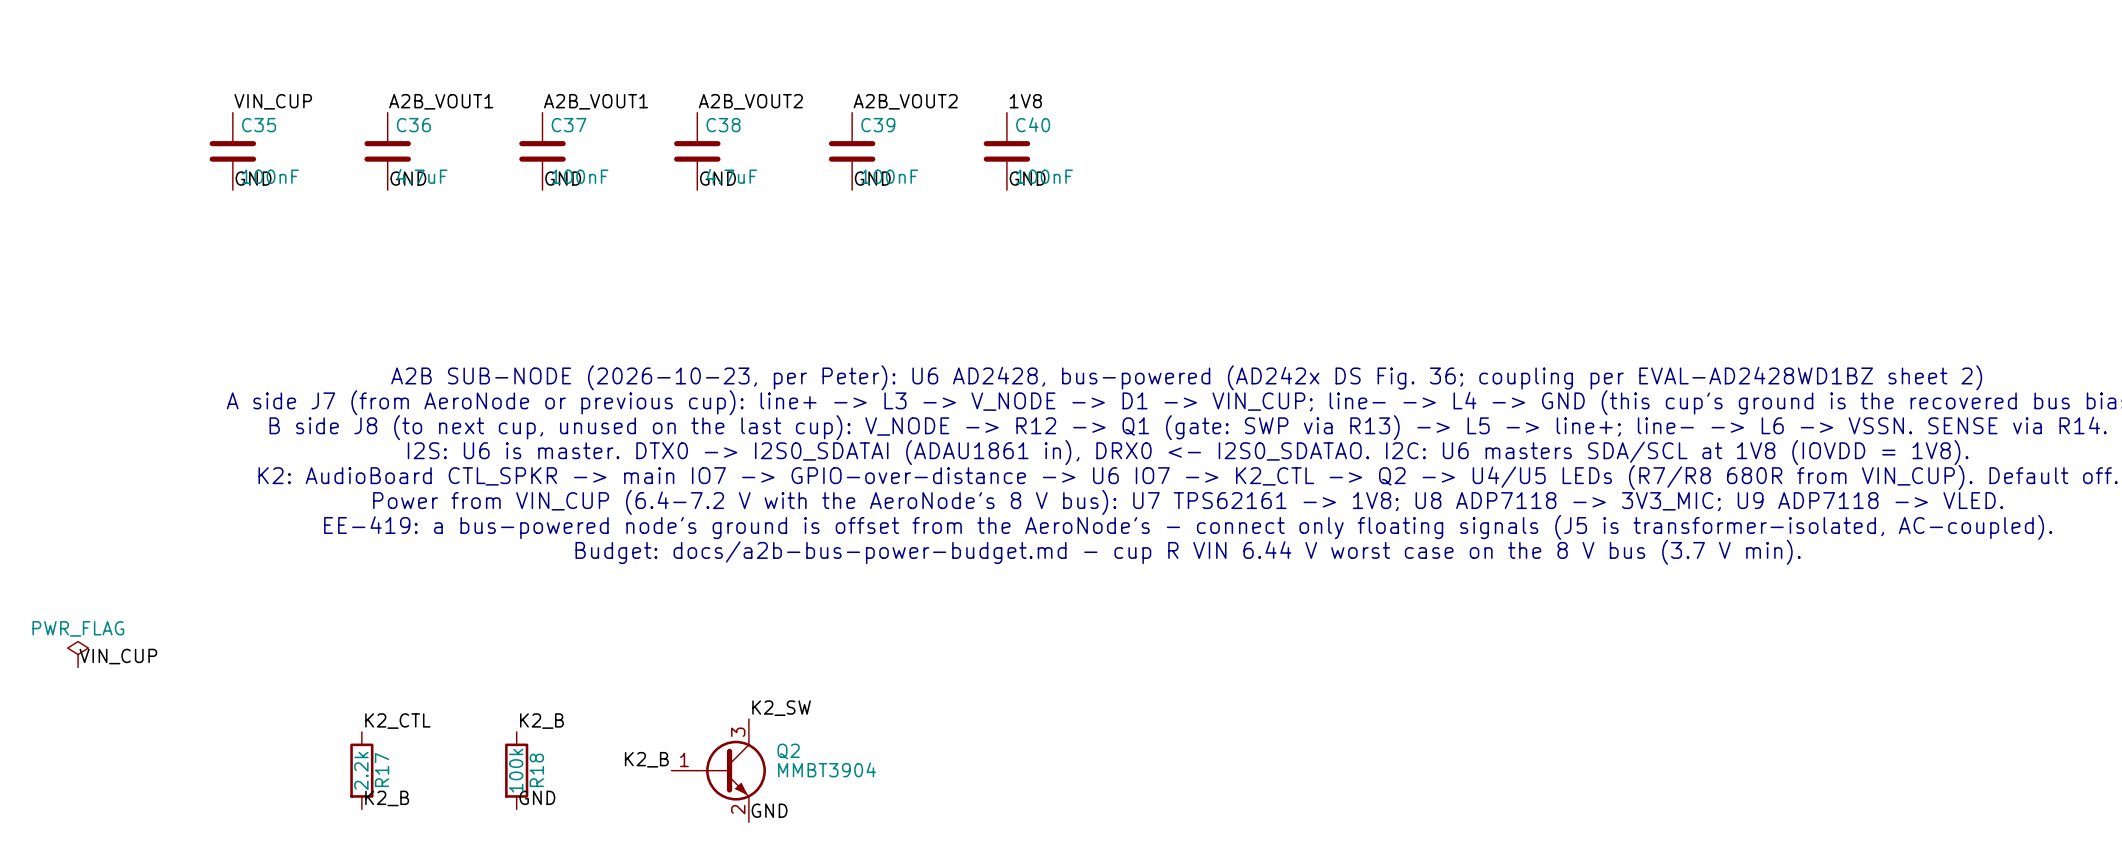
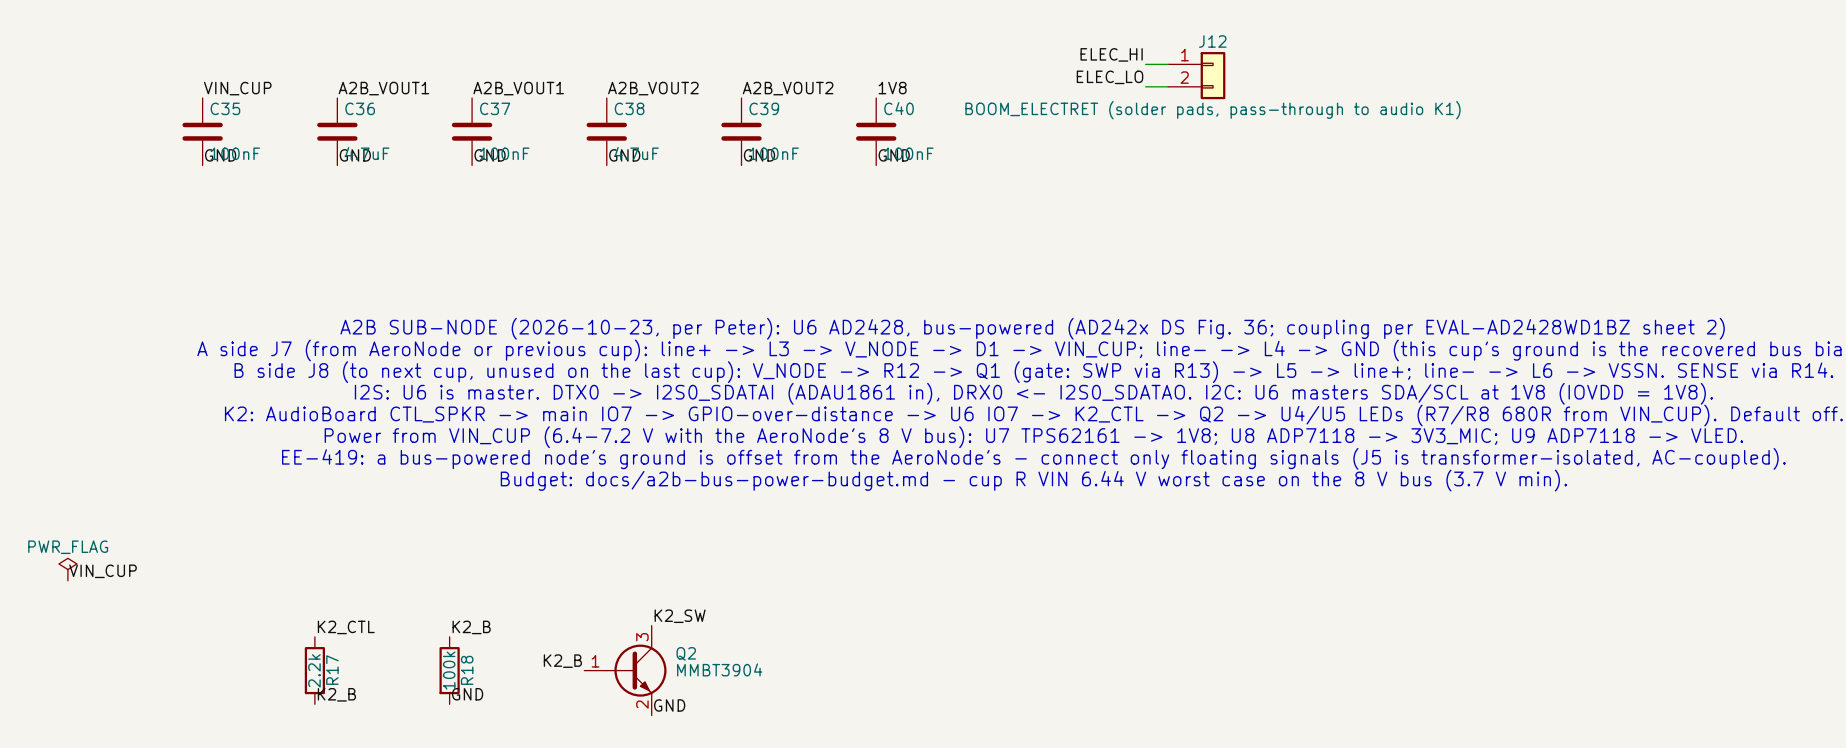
label: none -> ELEC_HI (1111, 54)
wire: none -> (1145, 64) (1168, 64)
J12: none -> BOOM_ELECTRET (solder pads, pass-through to audio K1) (1196, 75)
label: none -> ELEC_LO (1110, 77)
wire: none -> (1145, 86) (1168, 86)

